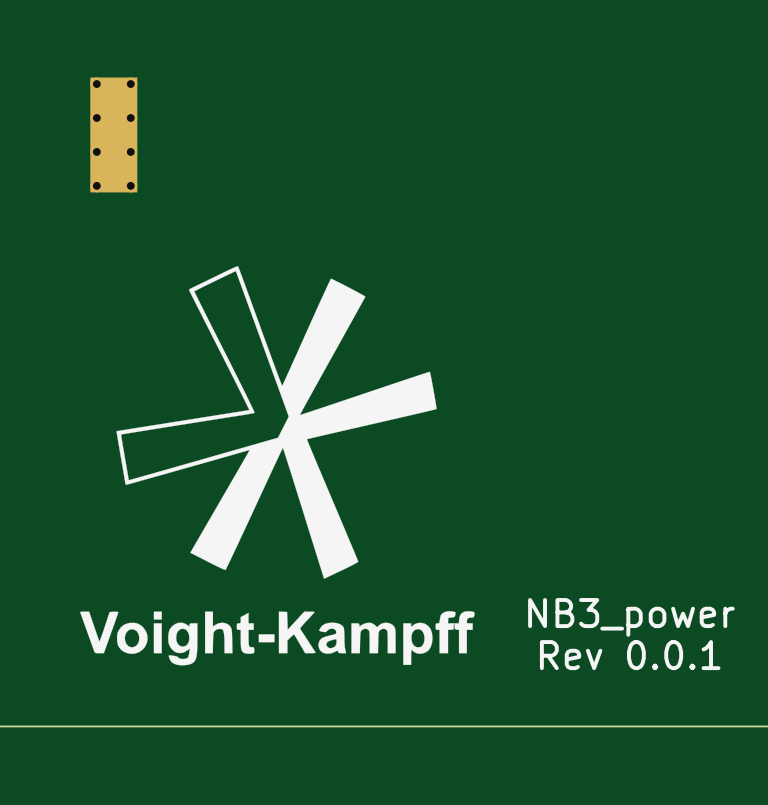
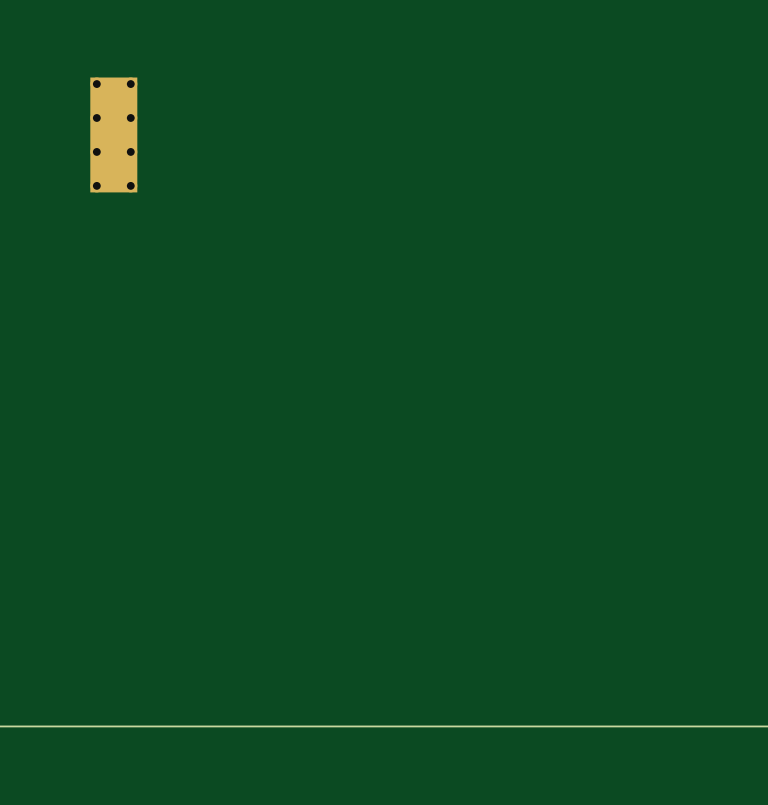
drawing: [80, 266, 475, 666] -> none
text: NB3_power (631, 617) -> none
text: Rev 0.0.1 (630, 655) -> none

